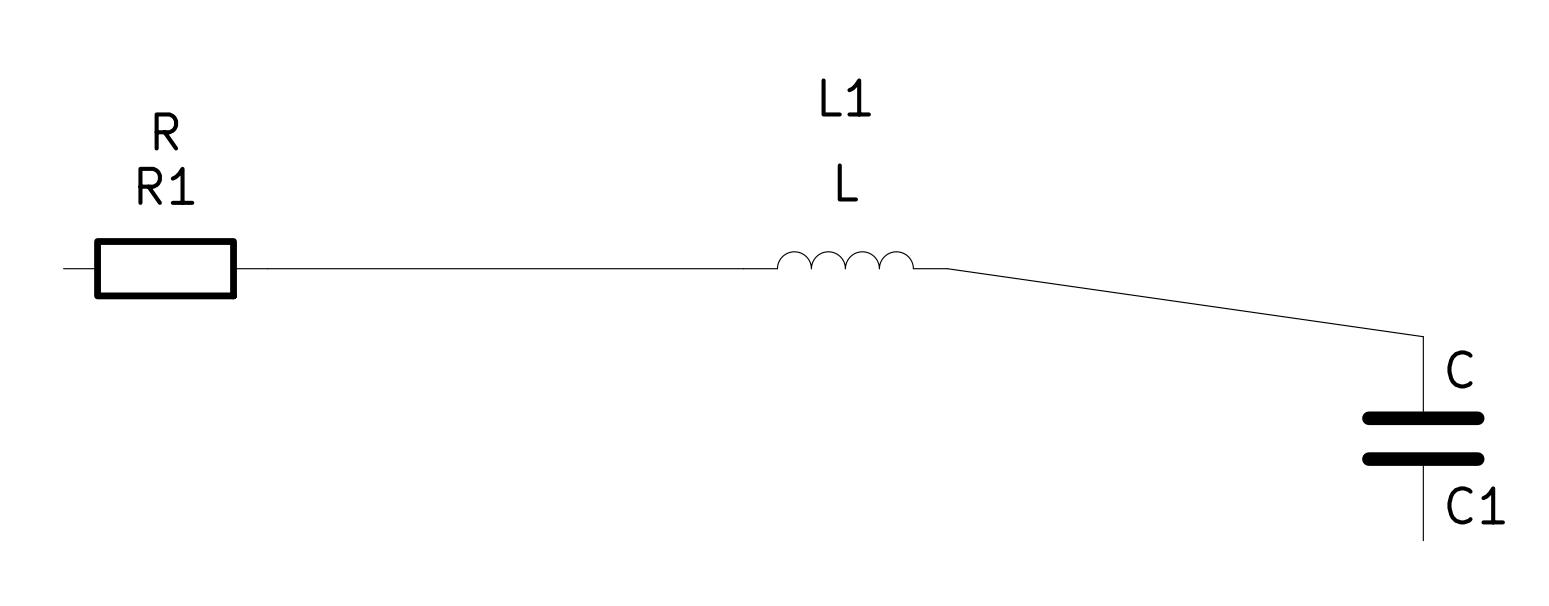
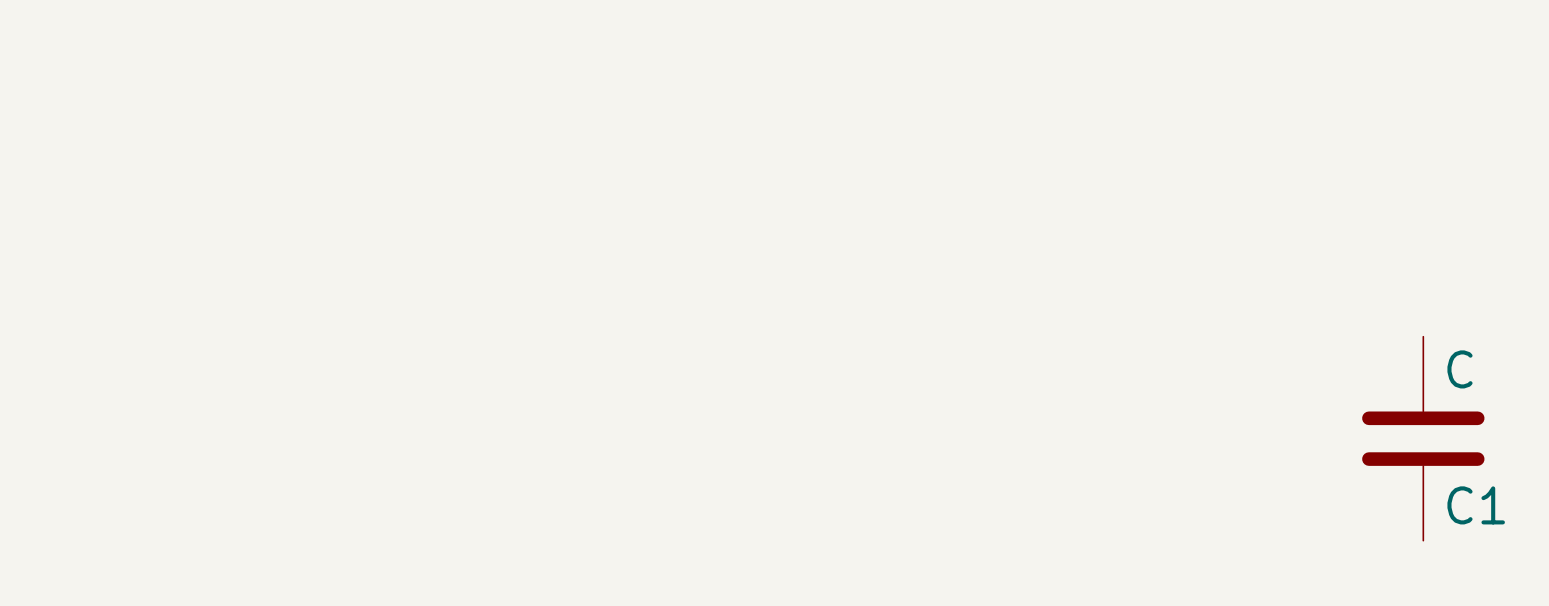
L1: L (845, 260) -> none
R1: R (165, 268) -> none
wire: (267, 268) (743, 268) -> none
wire: (947, 268) (1423, 336) -> none

